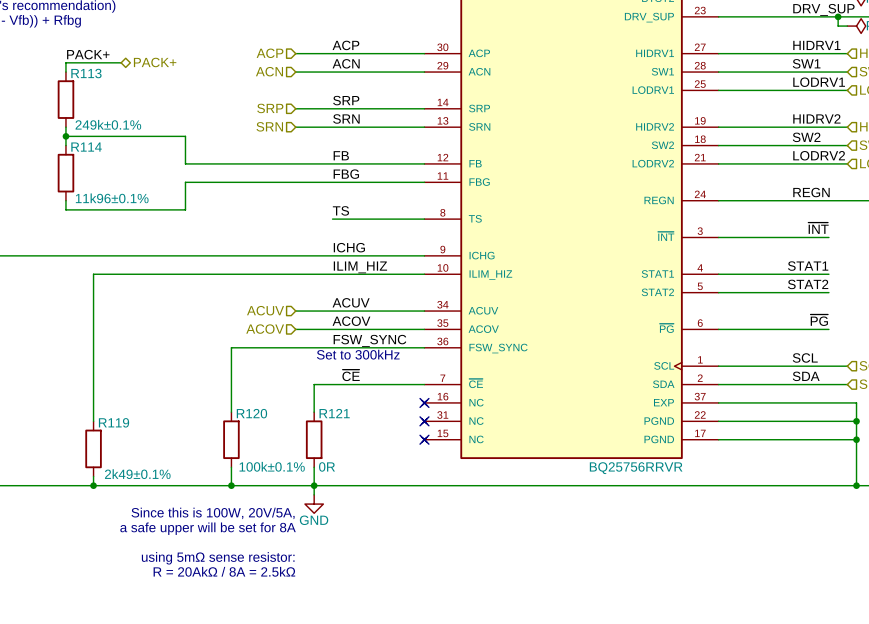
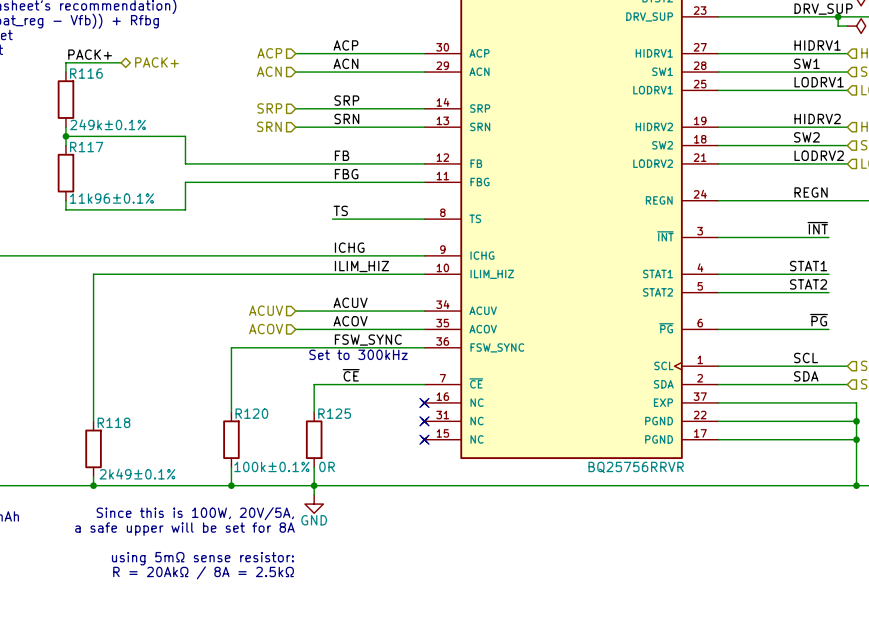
R113 name: R113 (86, 73) -> R116 (86, 73)
R114 name: R114 (86, 147) -> R117 (86, 147)
R121 name: R121 (334, 413) -> R125 (334, 413)
R119 name: R119 (114, 422) -> R118 (113, 422)

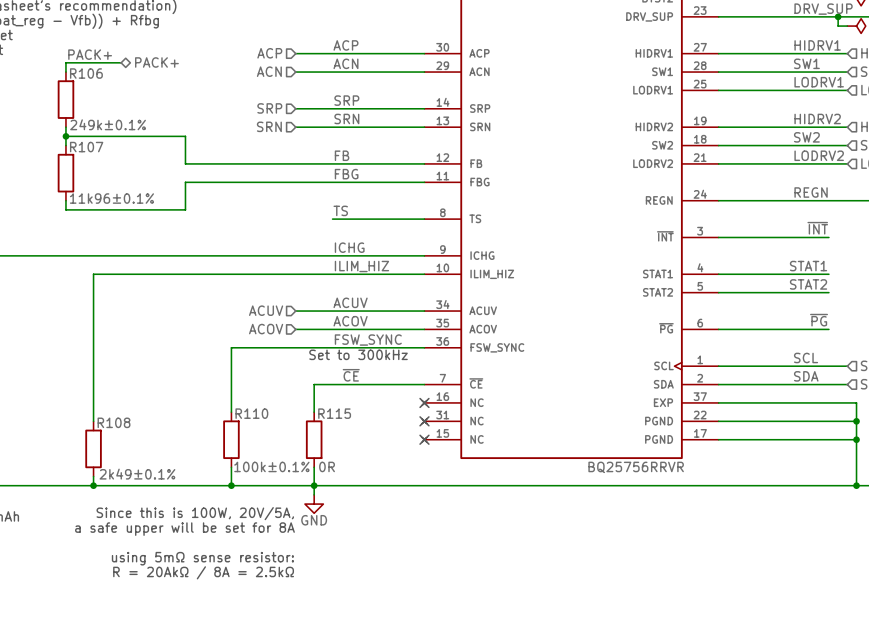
R116 name: R116 (86, 73) -> R106 (86, 73)
R117 name: R117 (86, 147) -> R107 (86, 147)
R120 name: R120 (251, 413) -> R110 (251, 413)
R125 name: R125 (334, 413) -> R115 (334, 413)
R118 name: R118 (113, 422) -> R108 (113, 422)

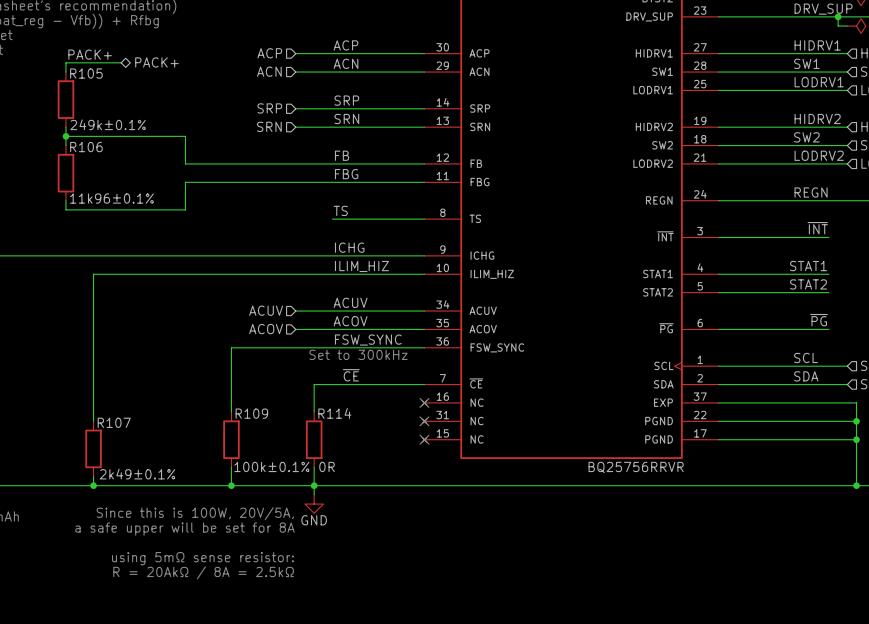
R106 name: R106 (86, 73) -> R105 (86, 73)
R107 name: R107 (86, 147) -> R106 (86, 147)
R110 name: R110 (251, 413) -> R109 (251, 413)
R115 name: R115 (334, 413) -> R114 (334, 413)
R108 name: R108 (113, 422) -> R107 (114, 422)

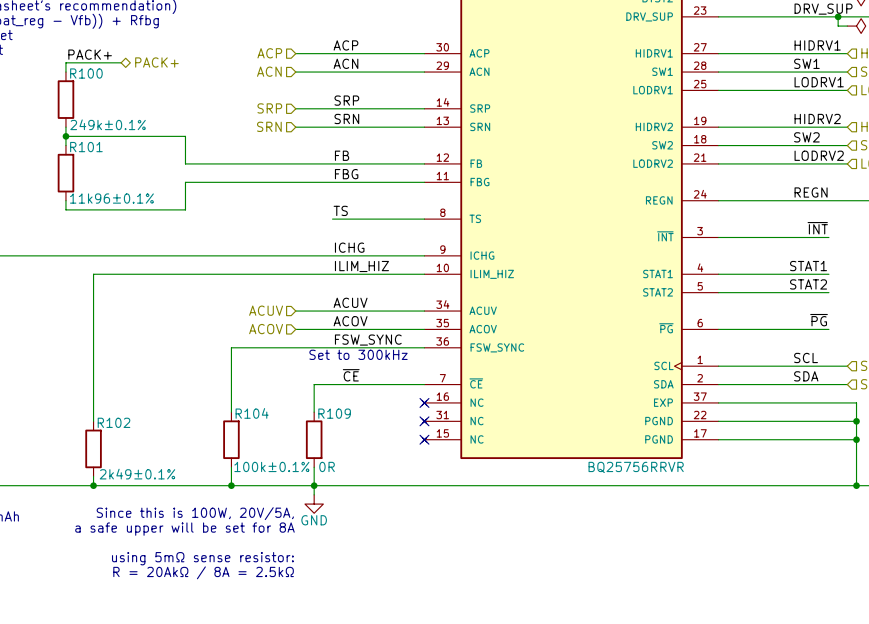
R105 name: R105 (86, 73) -> R100 (86, 73)
R106 name: R106 (86, 147) -> R101 (86, 147)
R109 name: R109 (251, 413) -> R104 (252, 413)
R114 name: R114 (334, 413) -> R109 (334, 413)
R107 name: R107 (114, 422) -> R102 (113, 422)

